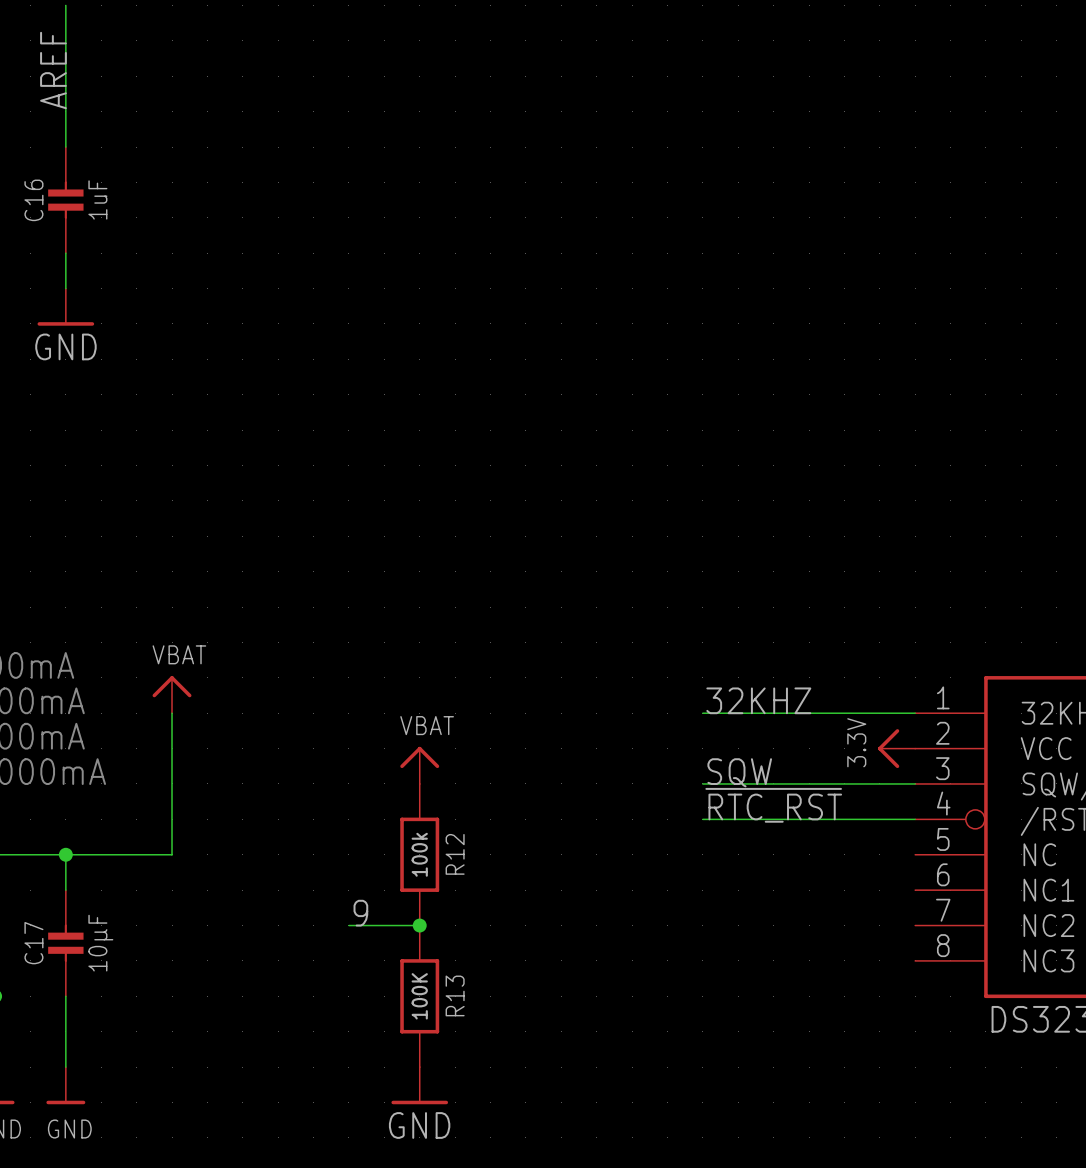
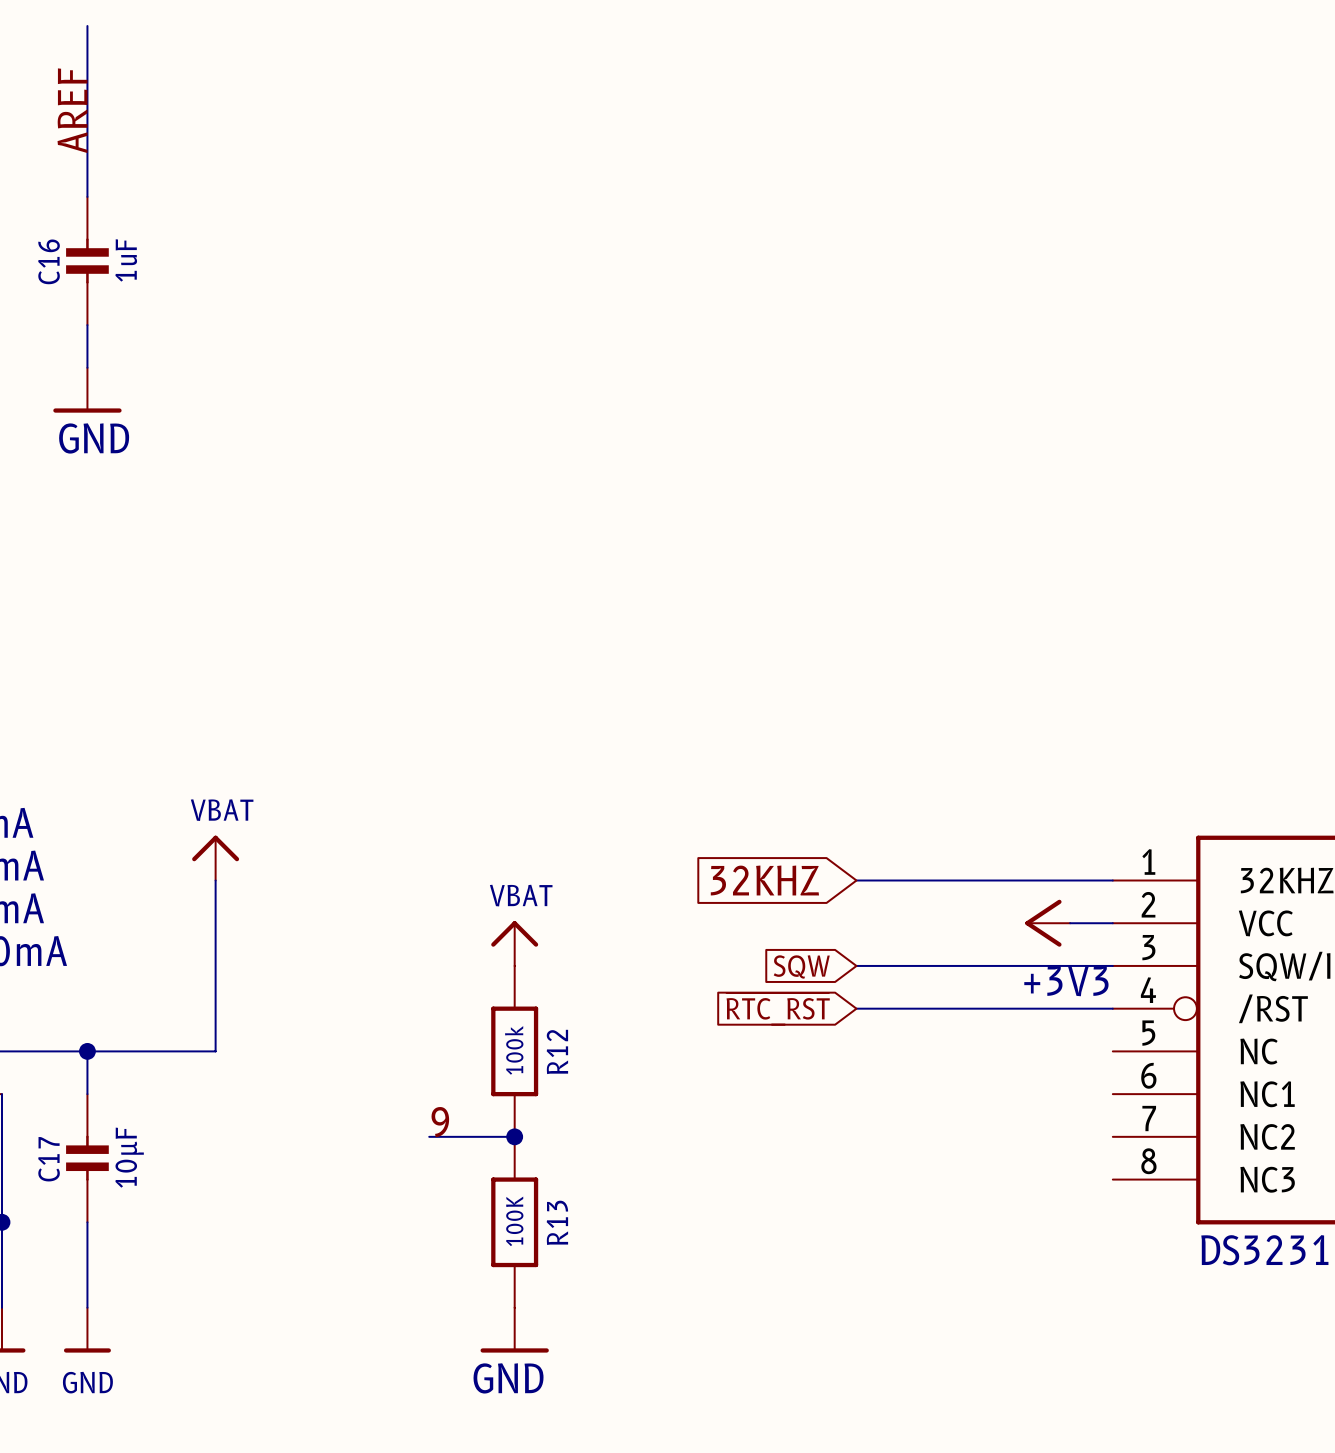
label: 32KHZ (758, 700) -> none
global label: none -> 32KHZ (764, 880)
power symbol: none -> +3V3 (1047, 923)
power symbol: 3.3V (896, 748) -> none
label: SQW (739, 772) -> none
global label: none -> SQW (801, 966)
label: ~{RTC_RST} (773, 805) -> none
global label: none -> ~{RTC_RST} (778, 1009)

